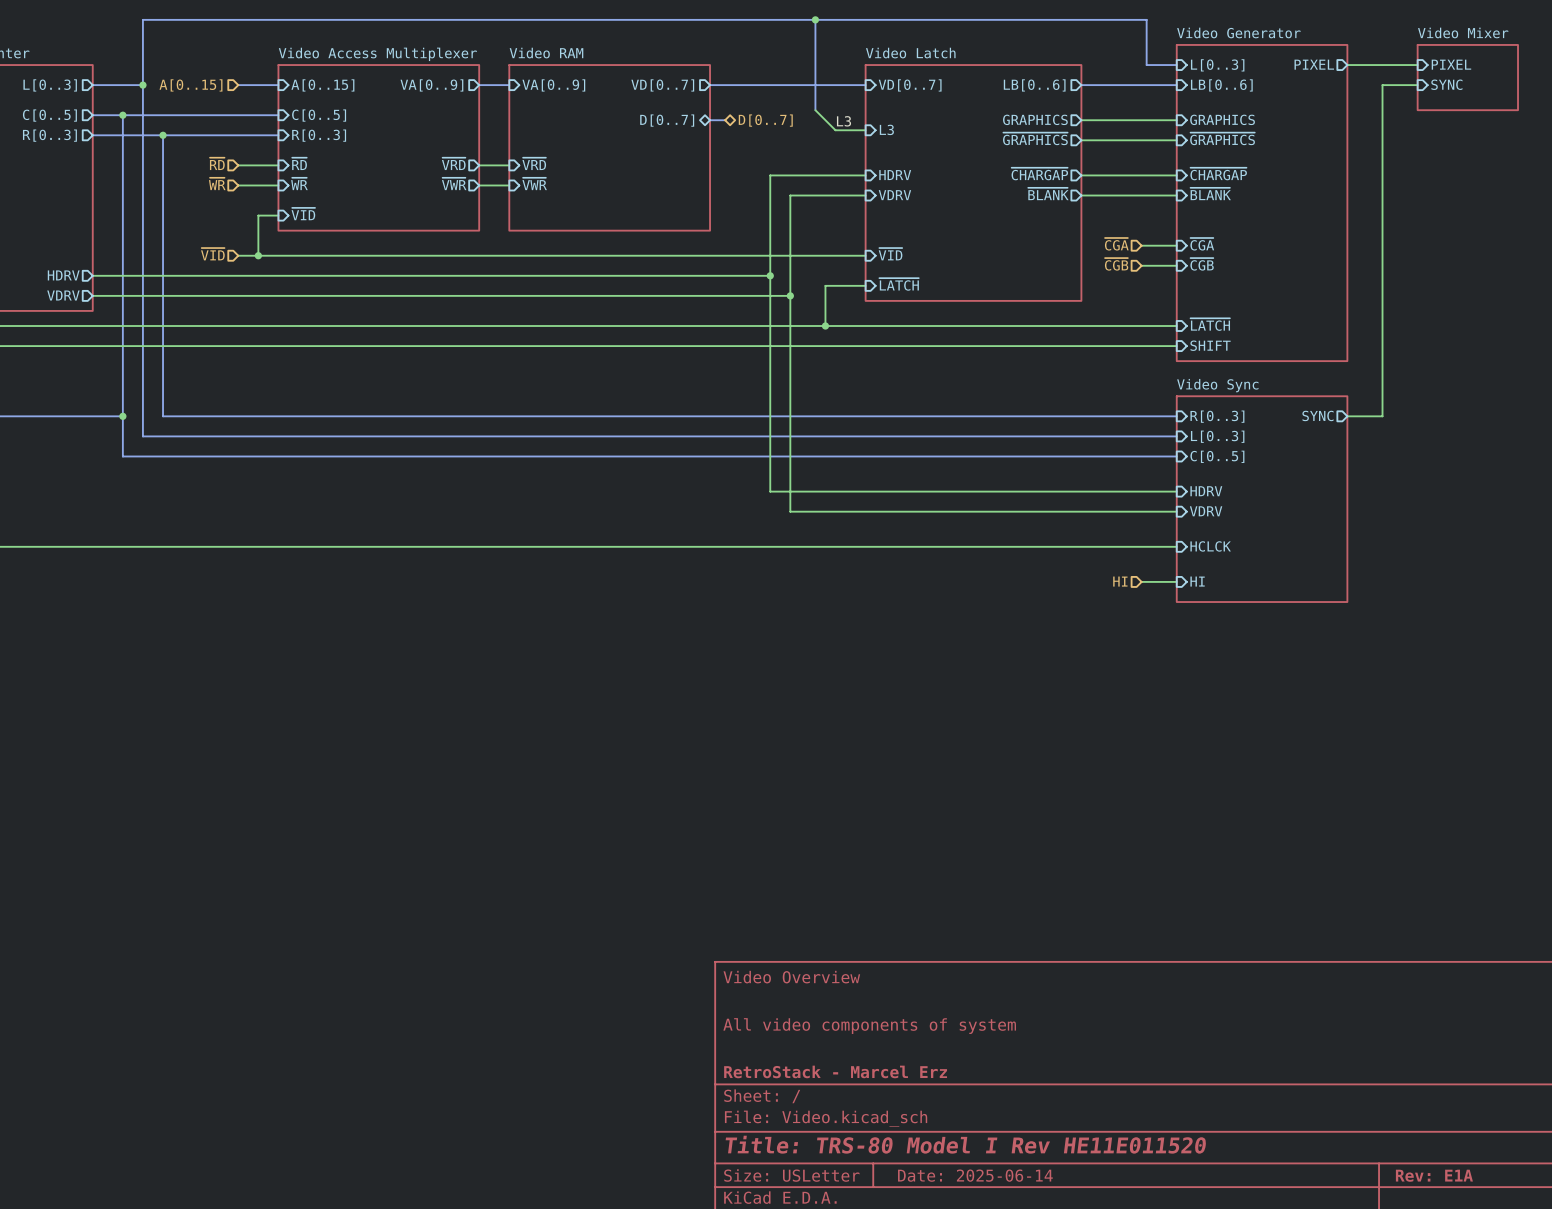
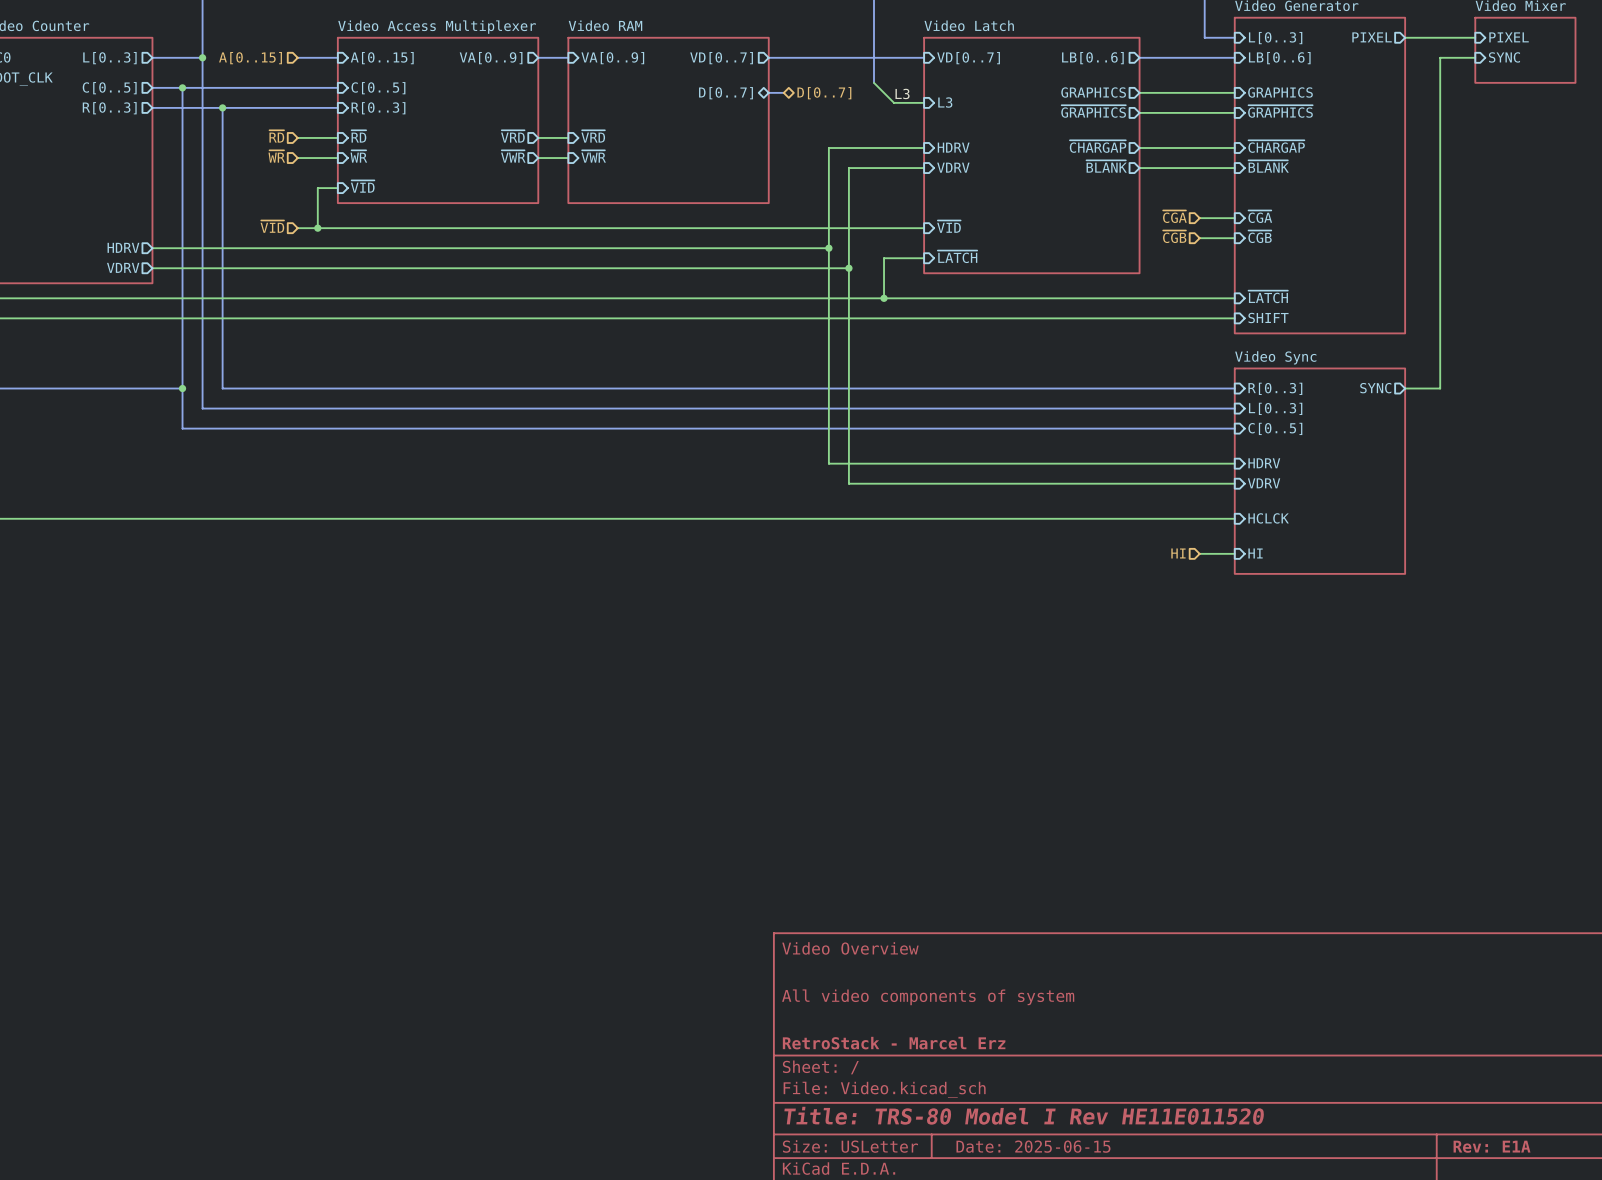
title block: Date: 2025-06-14 (975, 1175) -> Date: 2025-06-15 (1033, 1146)

